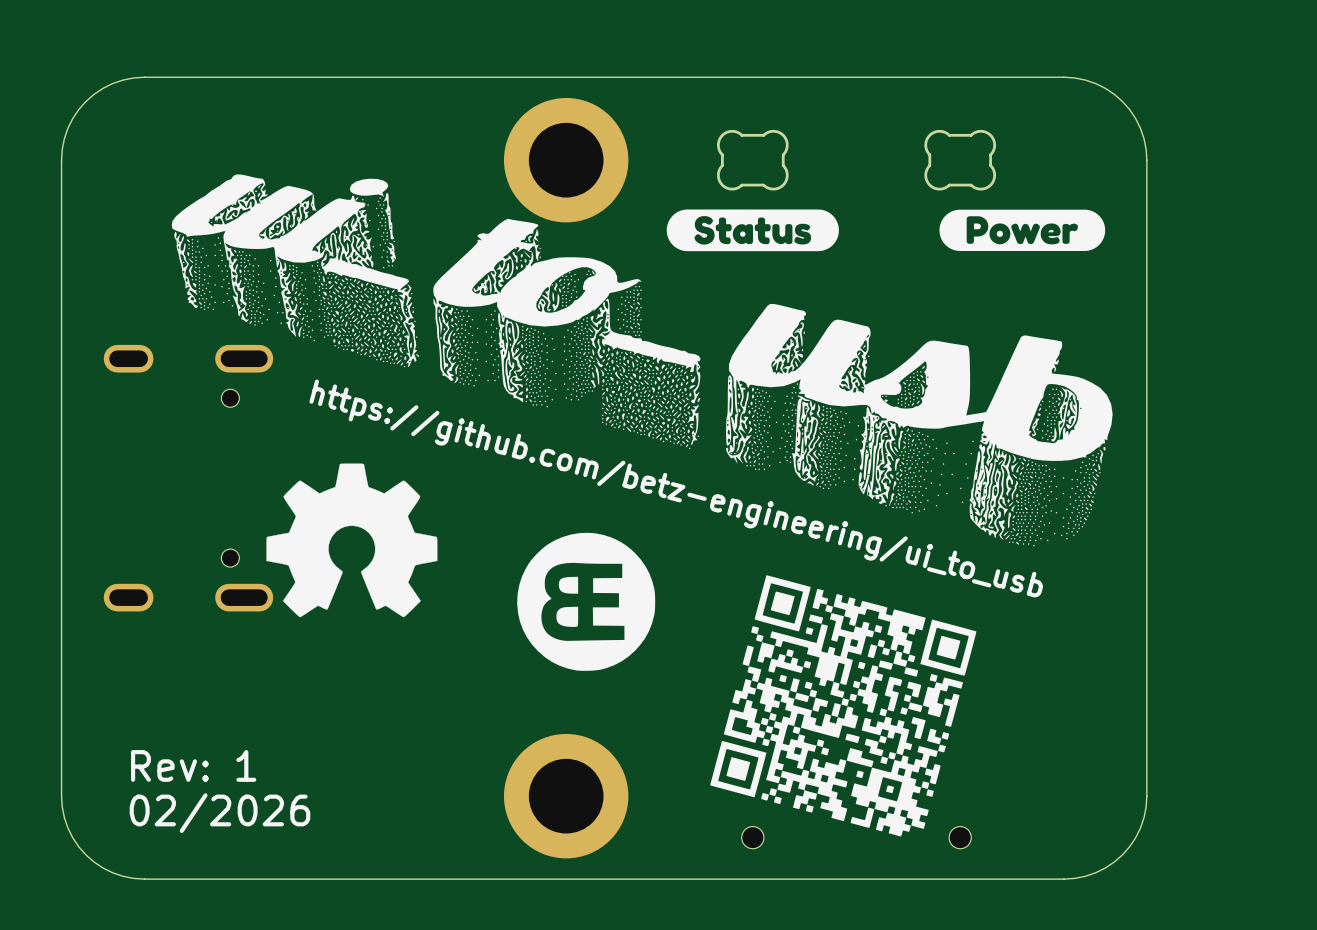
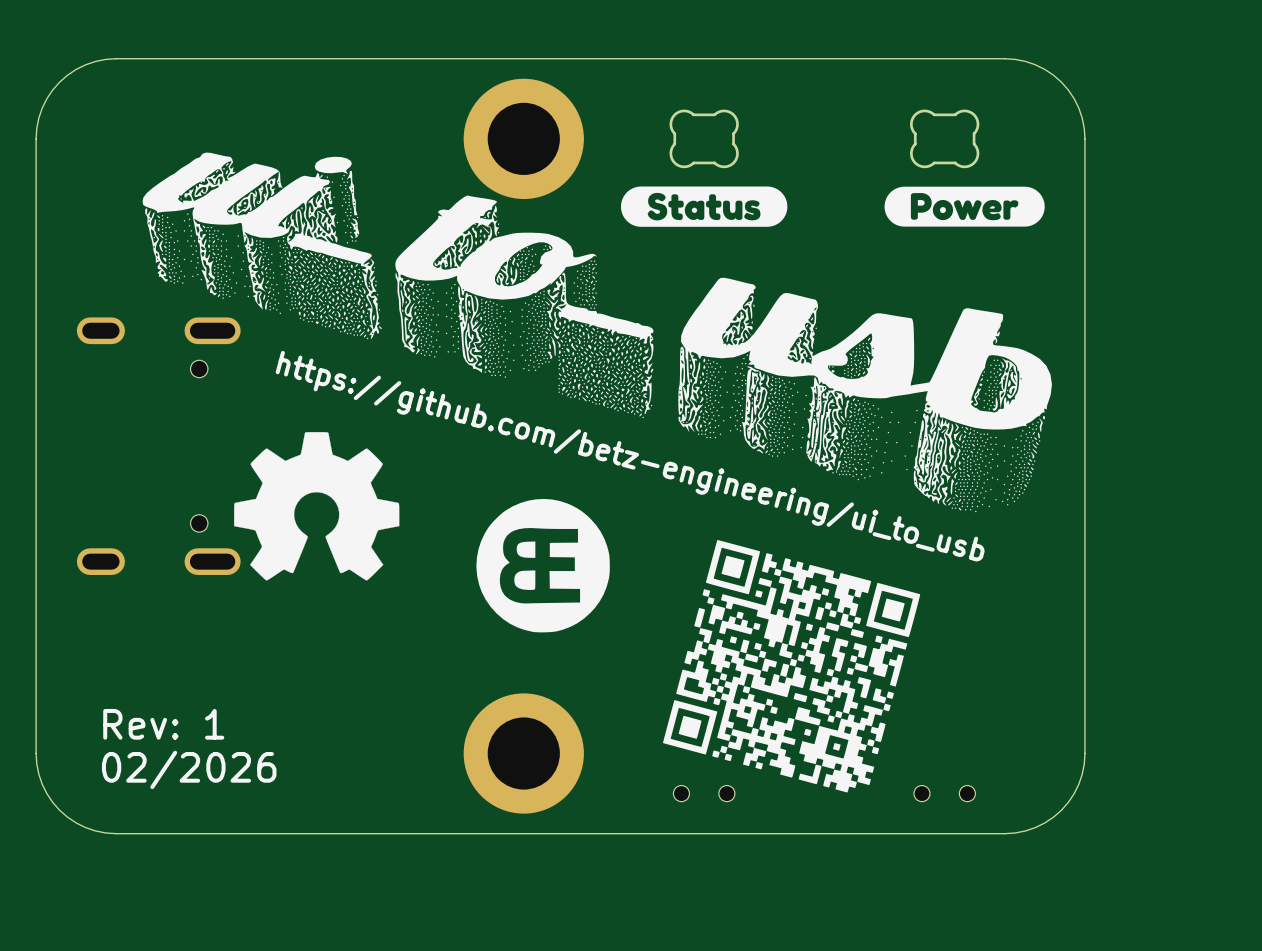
part position: (960, 160) -> (944, 138)
part footprint: [741, 826, 764, 849] -> [673, 785, 735, 802]
part: (960, 837) -> none
part: none -> (944, 793)

